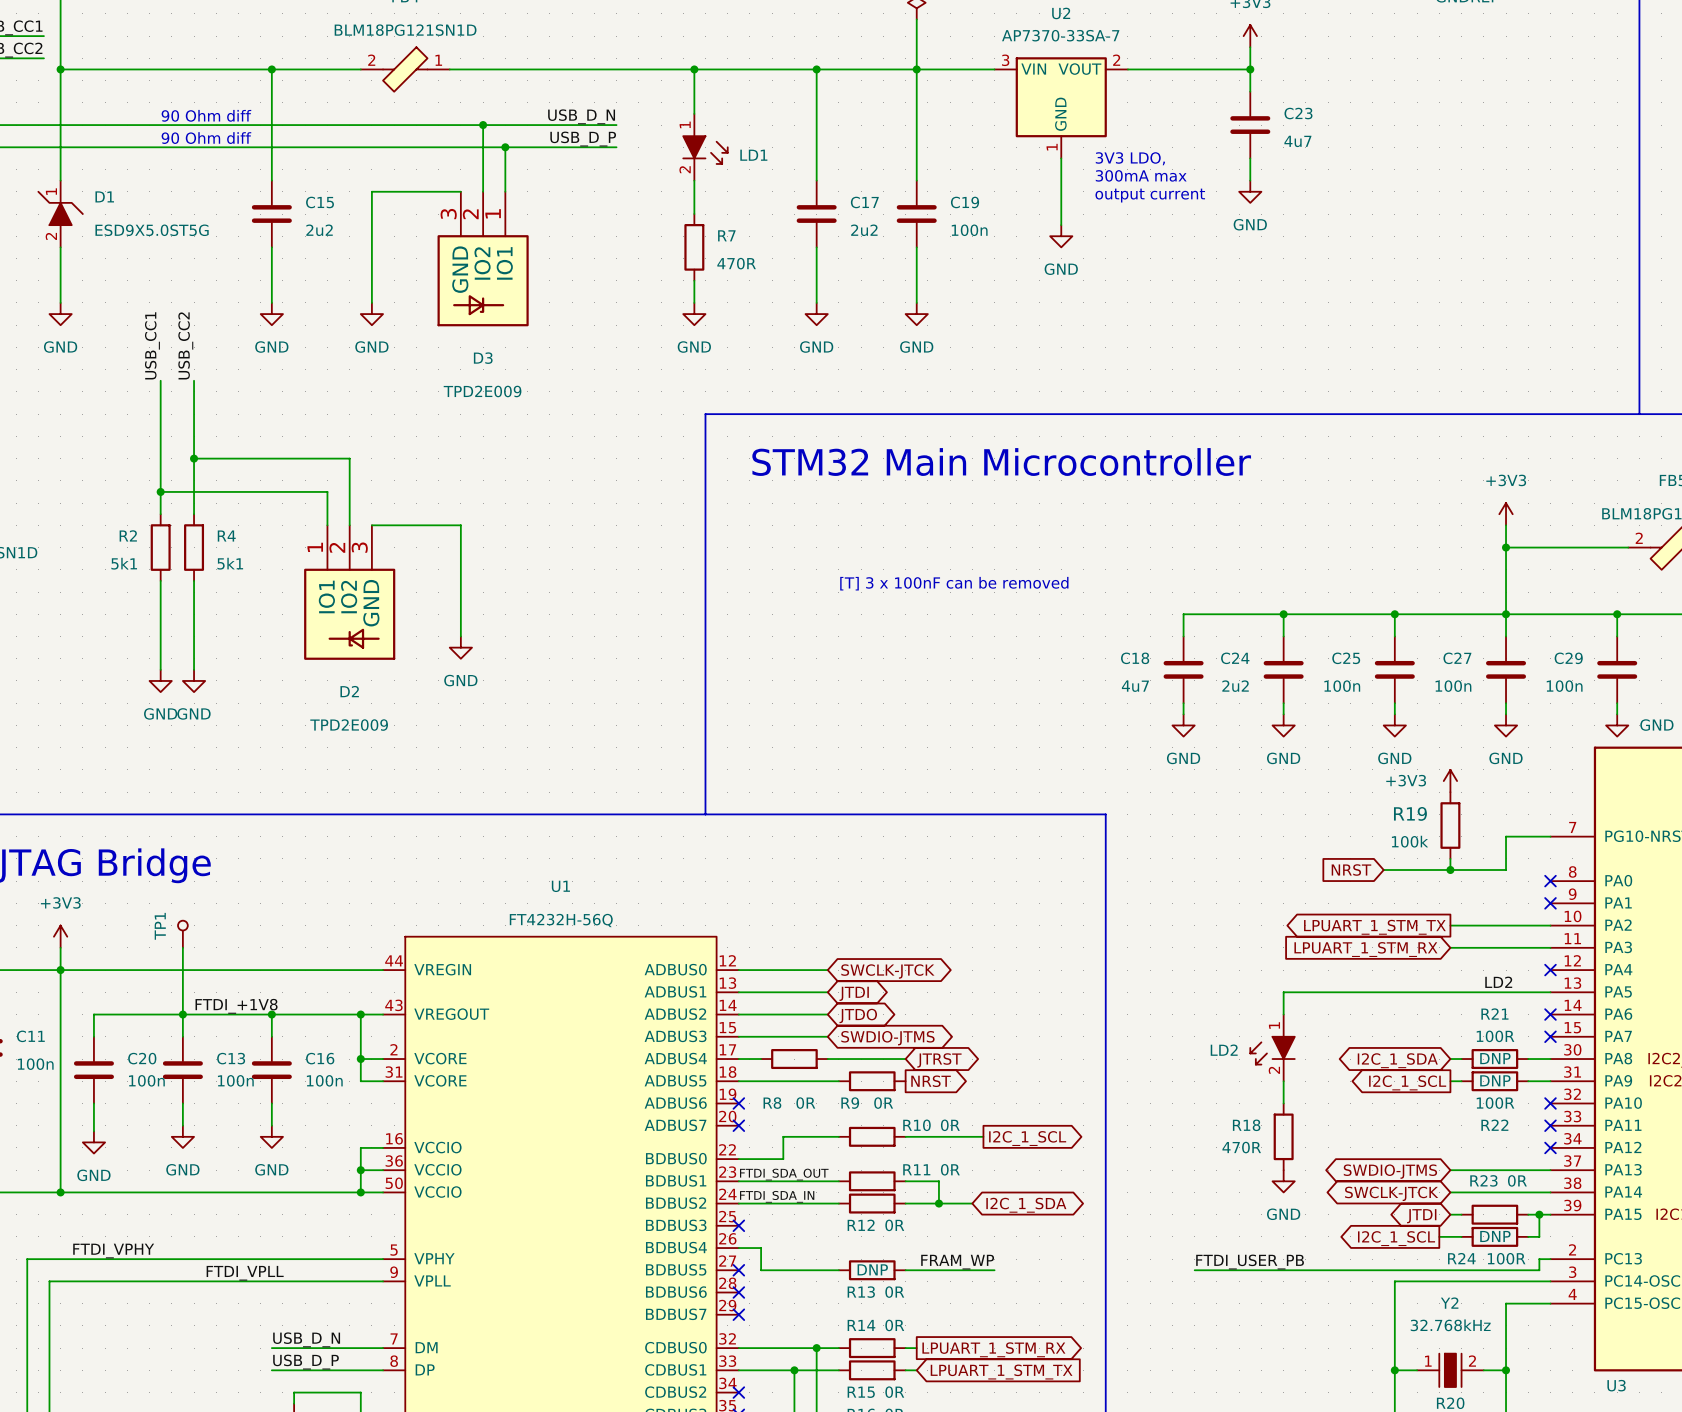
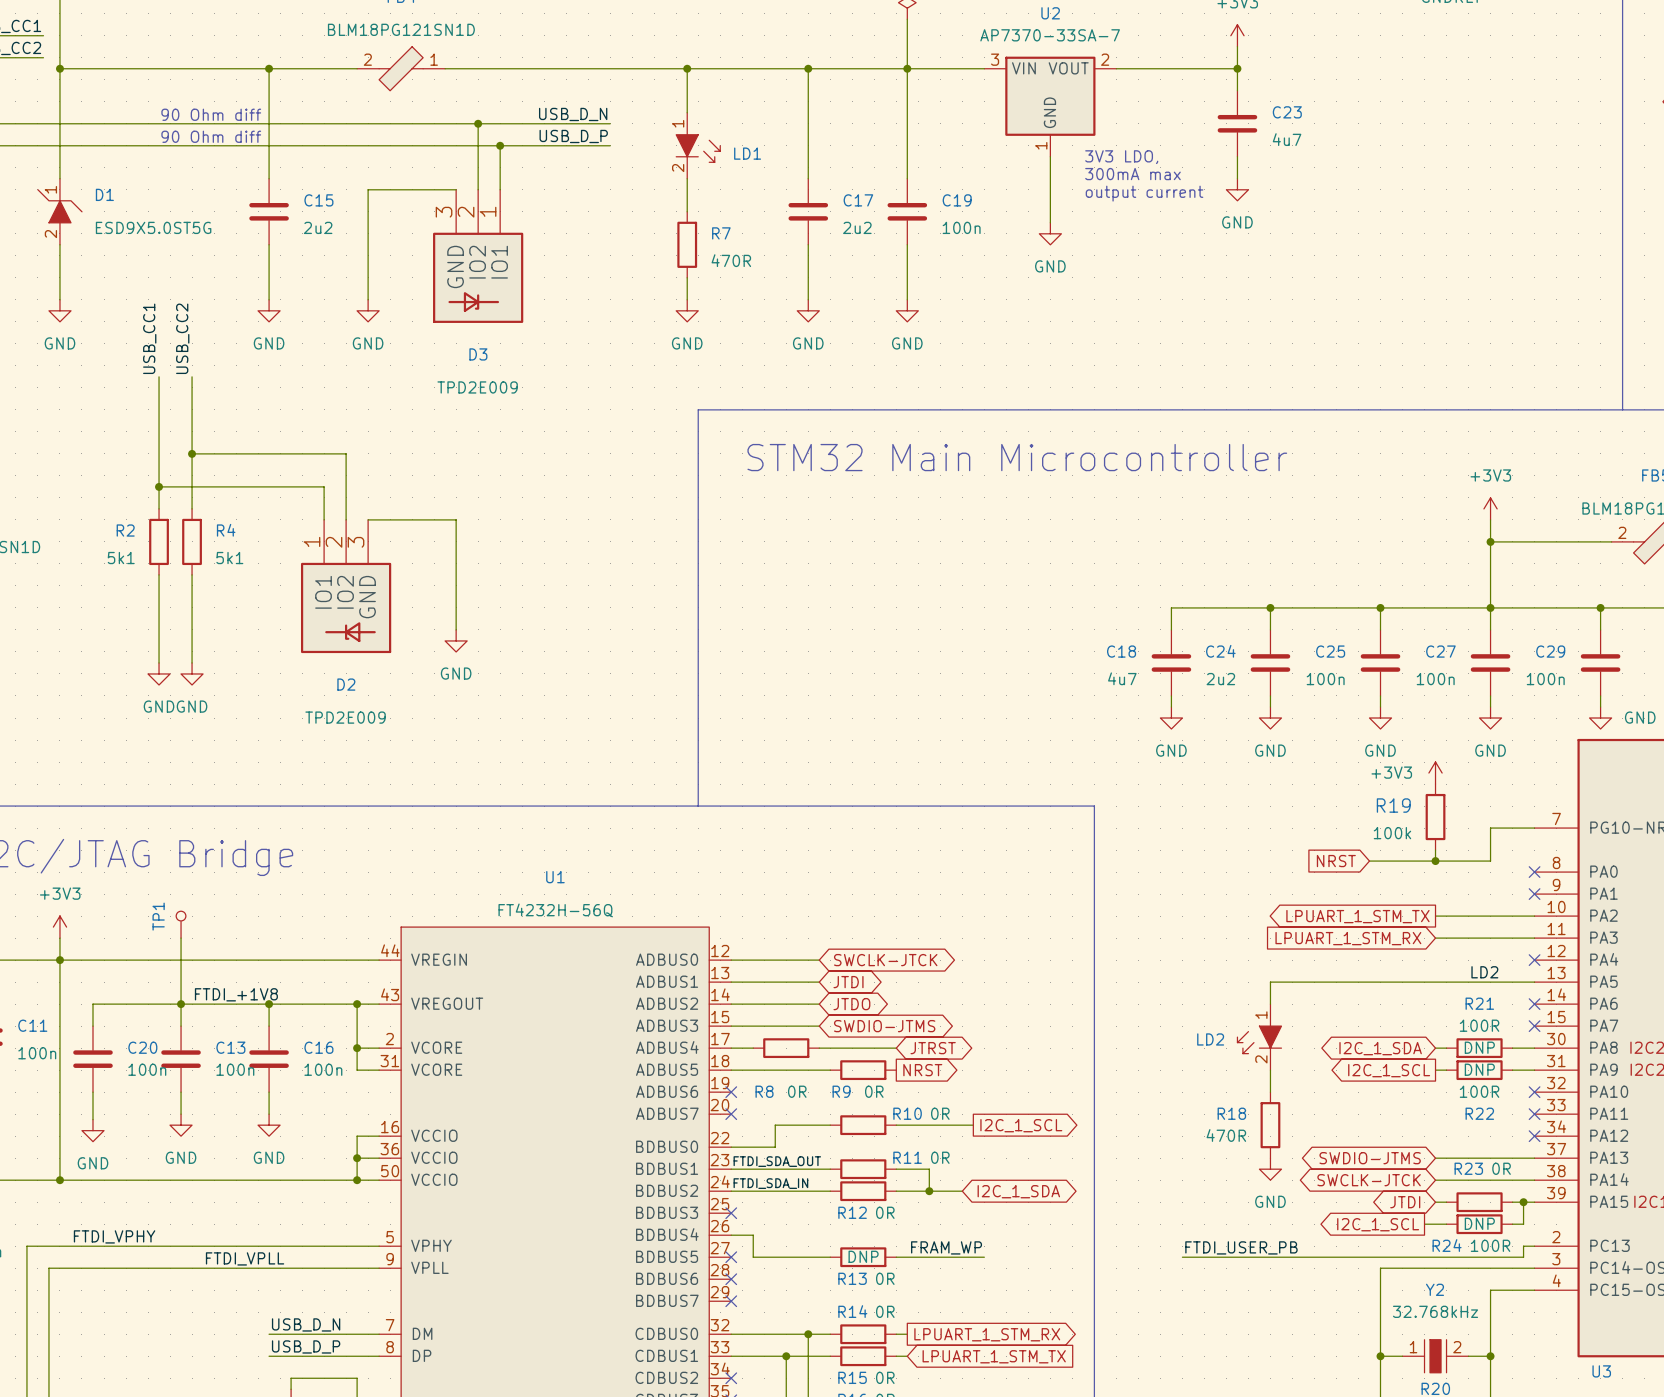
text: [T] 3 x 100nF can be removed (954, 583) -> none

